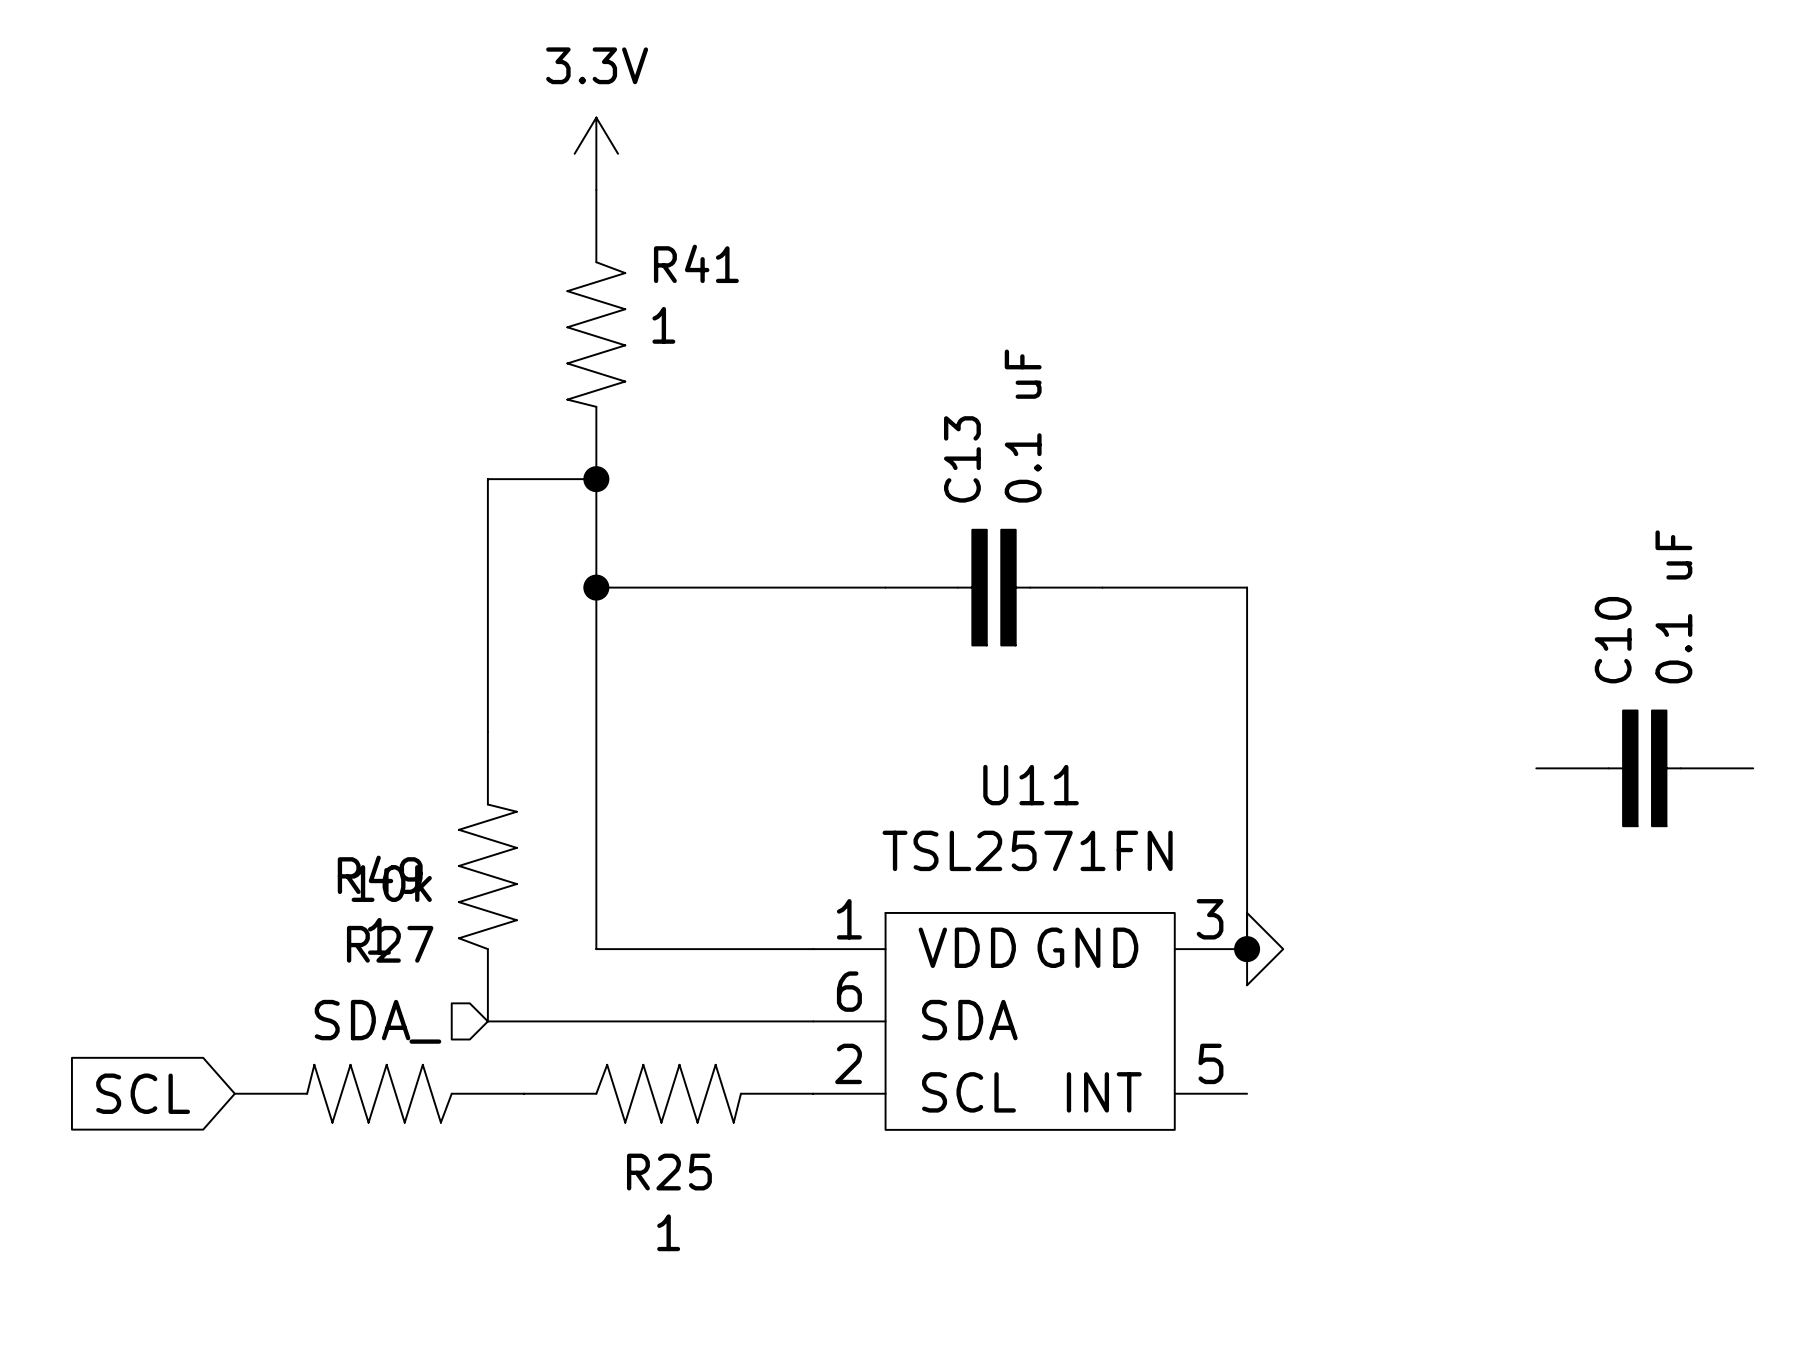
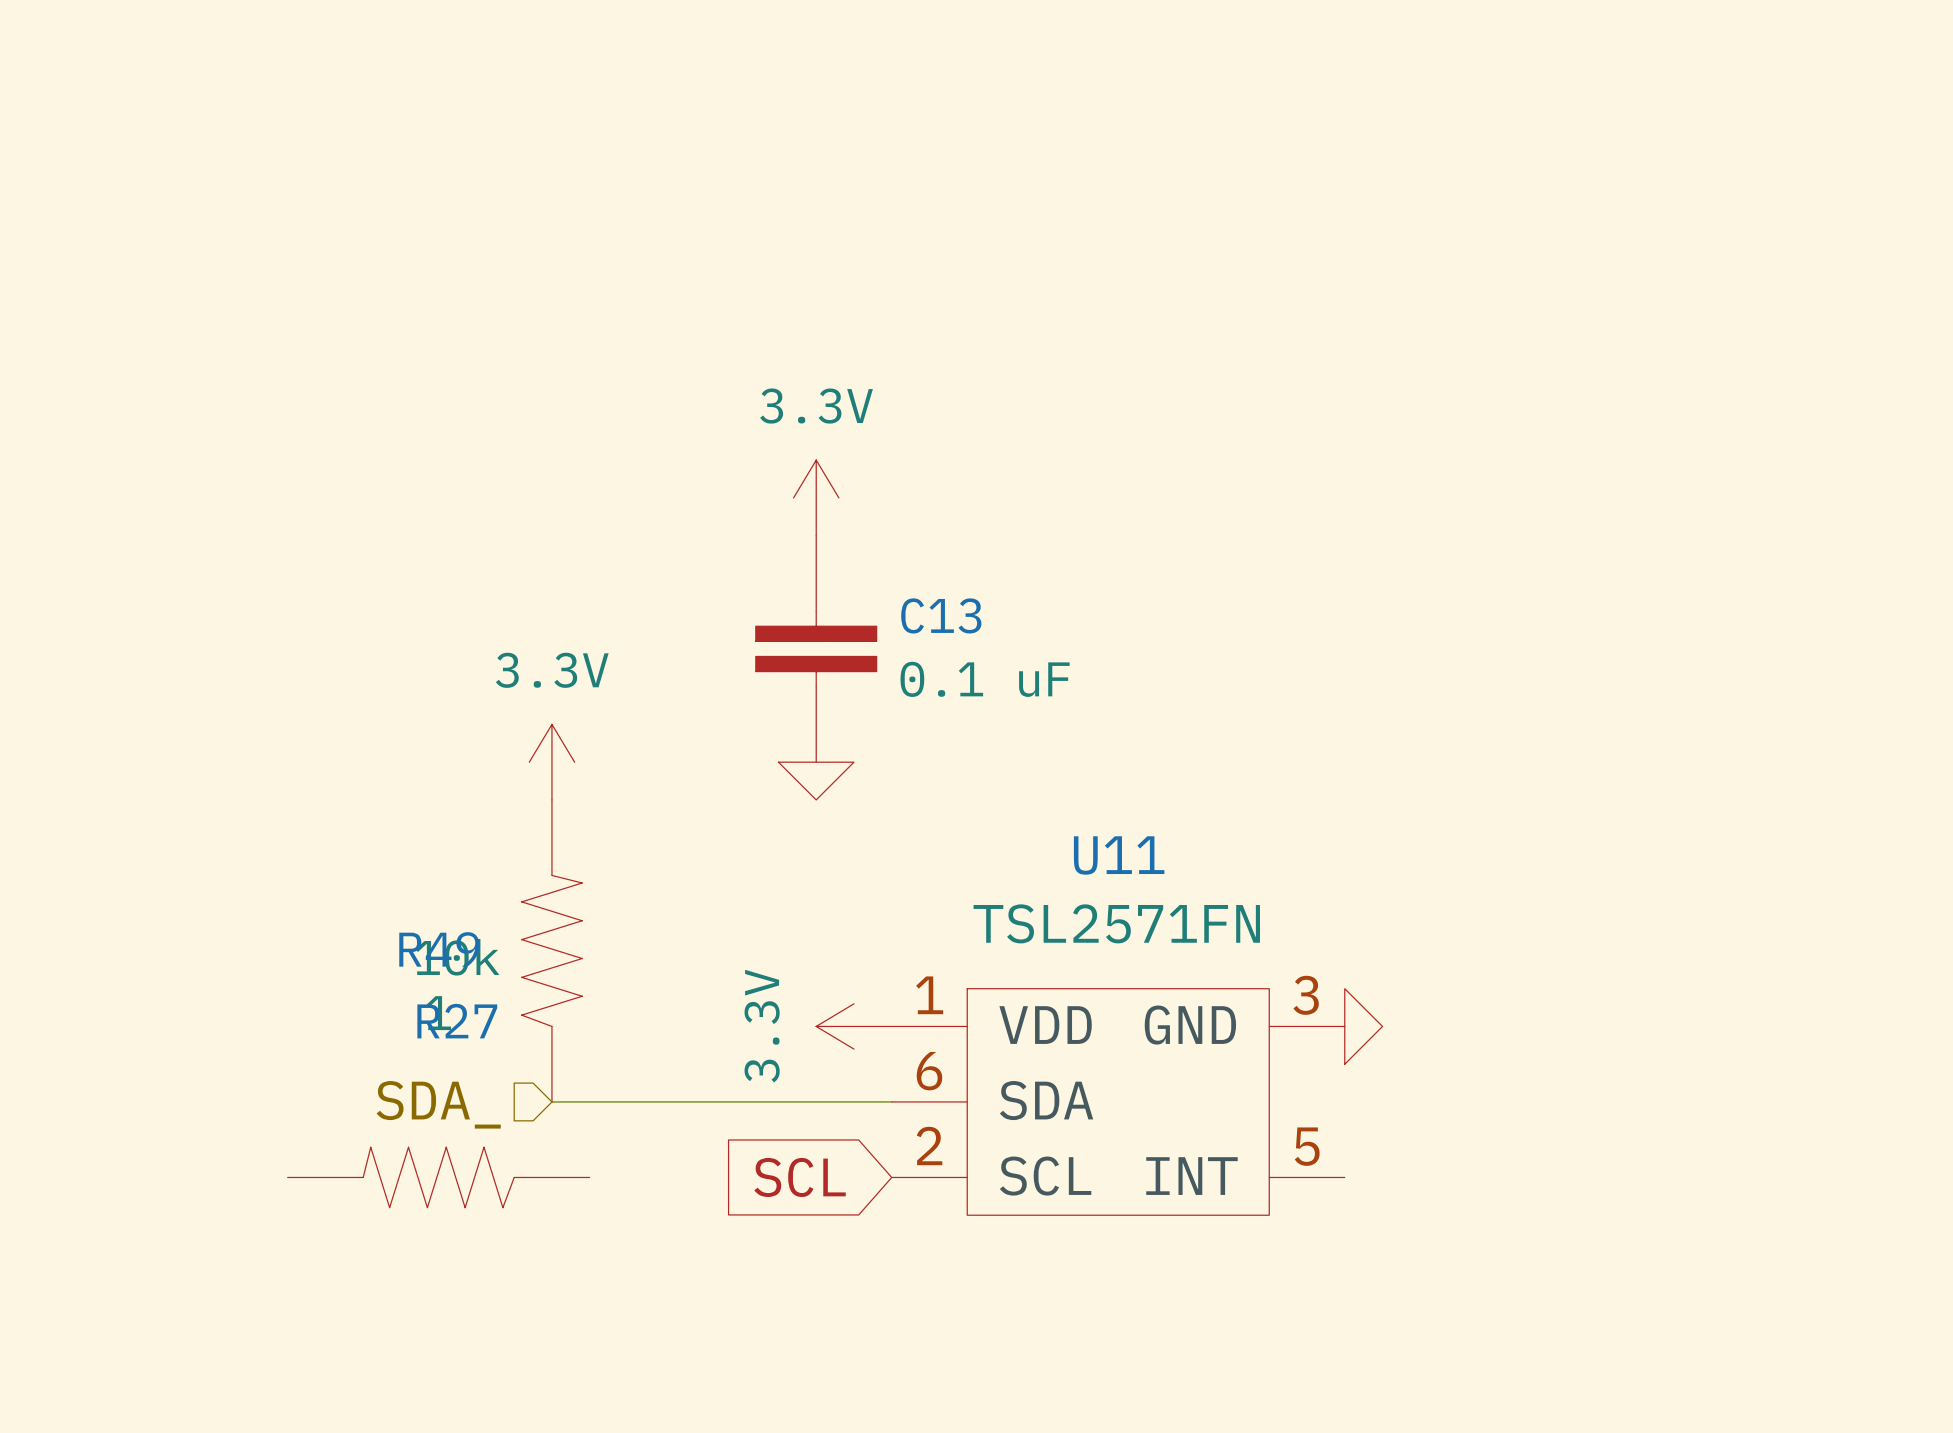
power symbol: 3.3V (596, 153) -> none
R41: 1 (596, 334) -> none
power symbol: none -> 3.3V (816, 497)
junction: (596, 479) -> none
wire: (596, 587) (885, 587) -> none
junction: (596, 587) -> none
C13 rotation: 0° (994, 587) -> 90° clockwise (816, 648)
C13 position: (994, 587) -> (816, 648)
wire: (1102, 587) (1247, 587) (1247, 949) -> none
power symbol: none -> 3.3V (551, 762)
power symbol: none -> (816, 781)
wire: (487, 732) (487, 479) (596, 479) (596, 949) (813, 949) -> none
C10: 0.1 uF (1644, 768) -> none
power symbol: none -> 3.3V (853, 1026)
junction: (1247, 949) -> none
global label position: SCL (143, 1093) -> SCL (800, 1177)
R25: 1 (668, 1093) -> none

